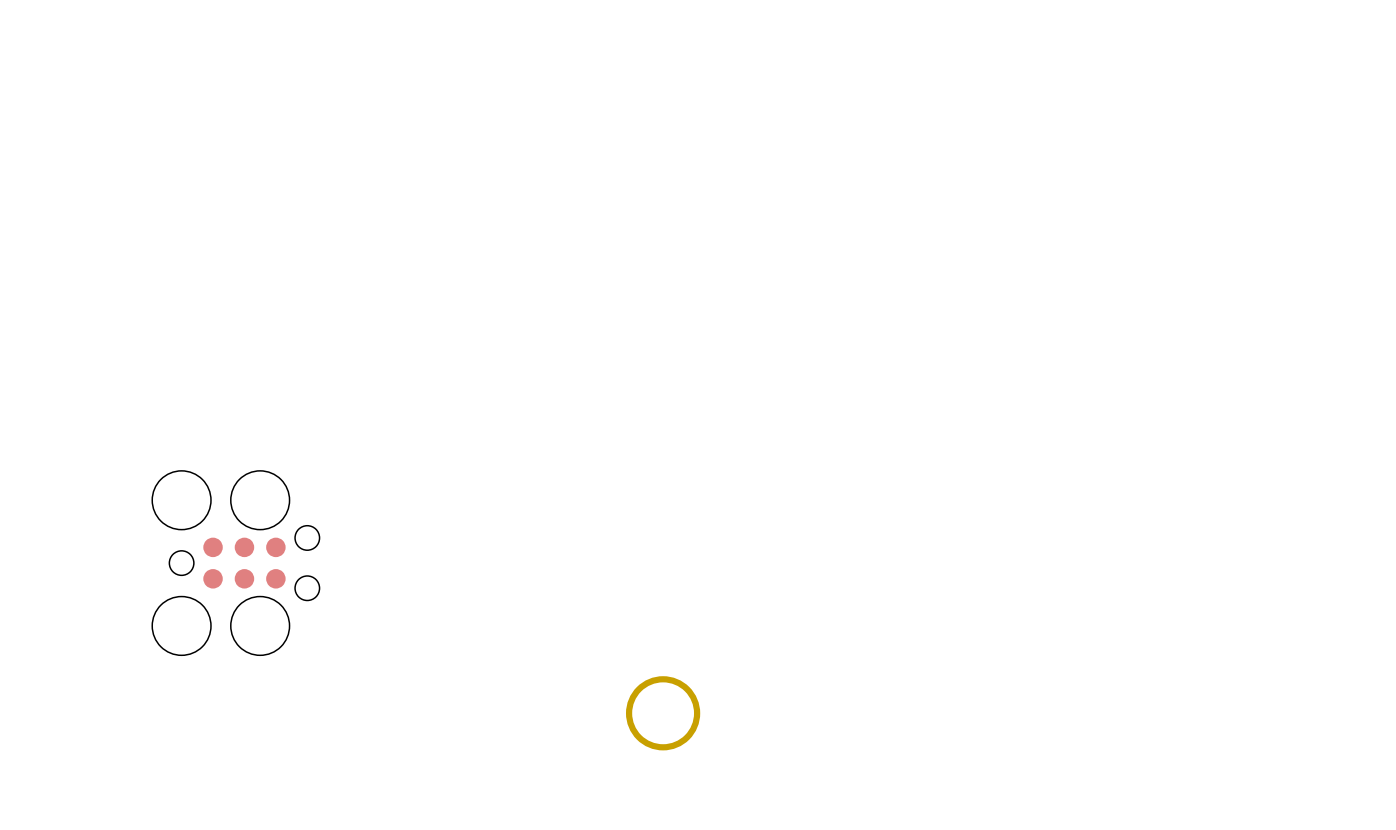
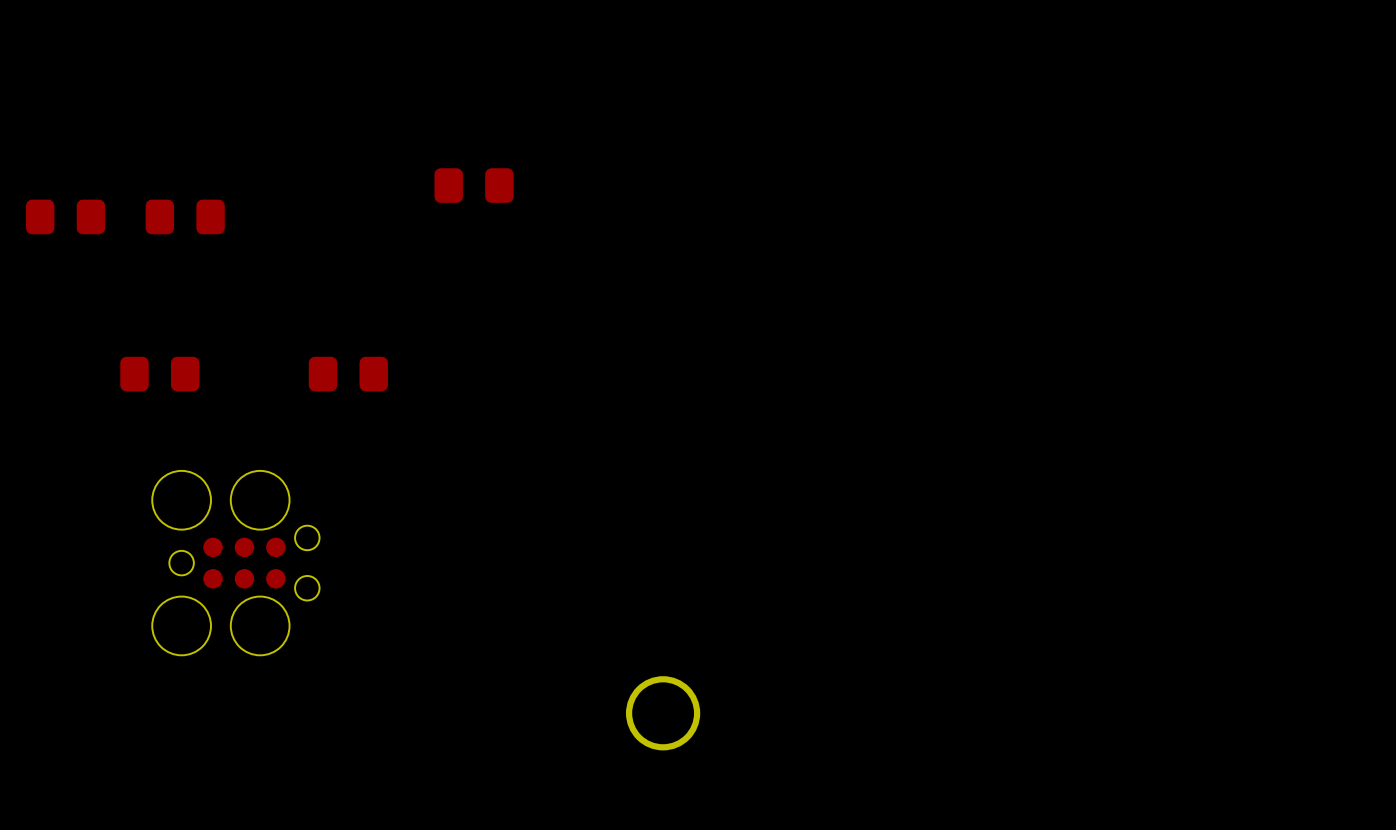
part: none -> (474, 185)
part: none -> (65, 216)
part: none -> (185, 216)
part: none -> (159, 374)
part: none -> (348, 374)

